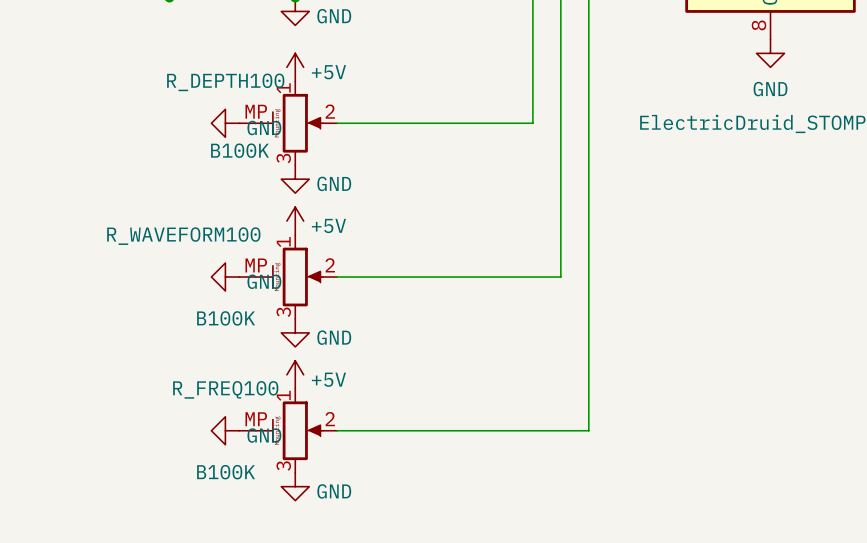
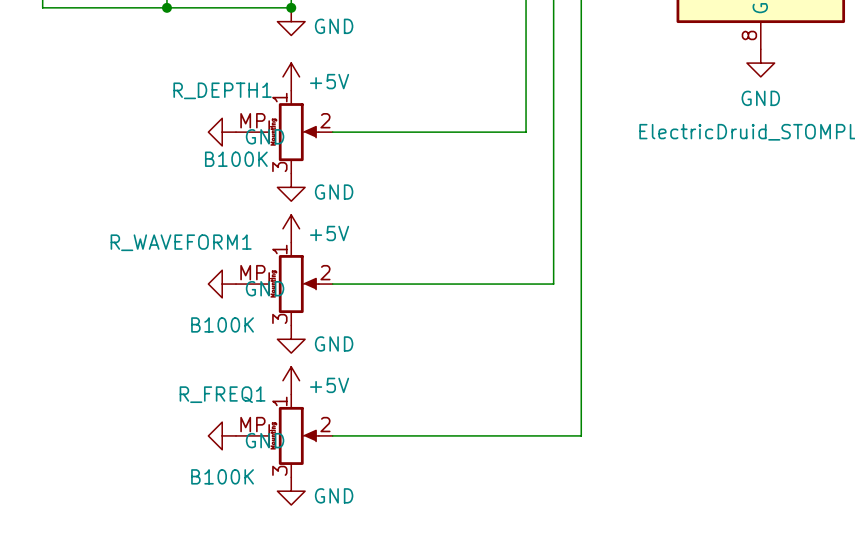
R_DEPTH100 name: R_DEPTH100 (225, 82) -> R_DEPTH1 (222, 90)
R_WAVEFORM100 name: R_WAVEFORM100 (183, 236) -> R_WAVEFORM1 (181, 242)
R_FREQ100 name: R_FREQ100 (225, 389) -> R_FREQ1 (222, 394)

